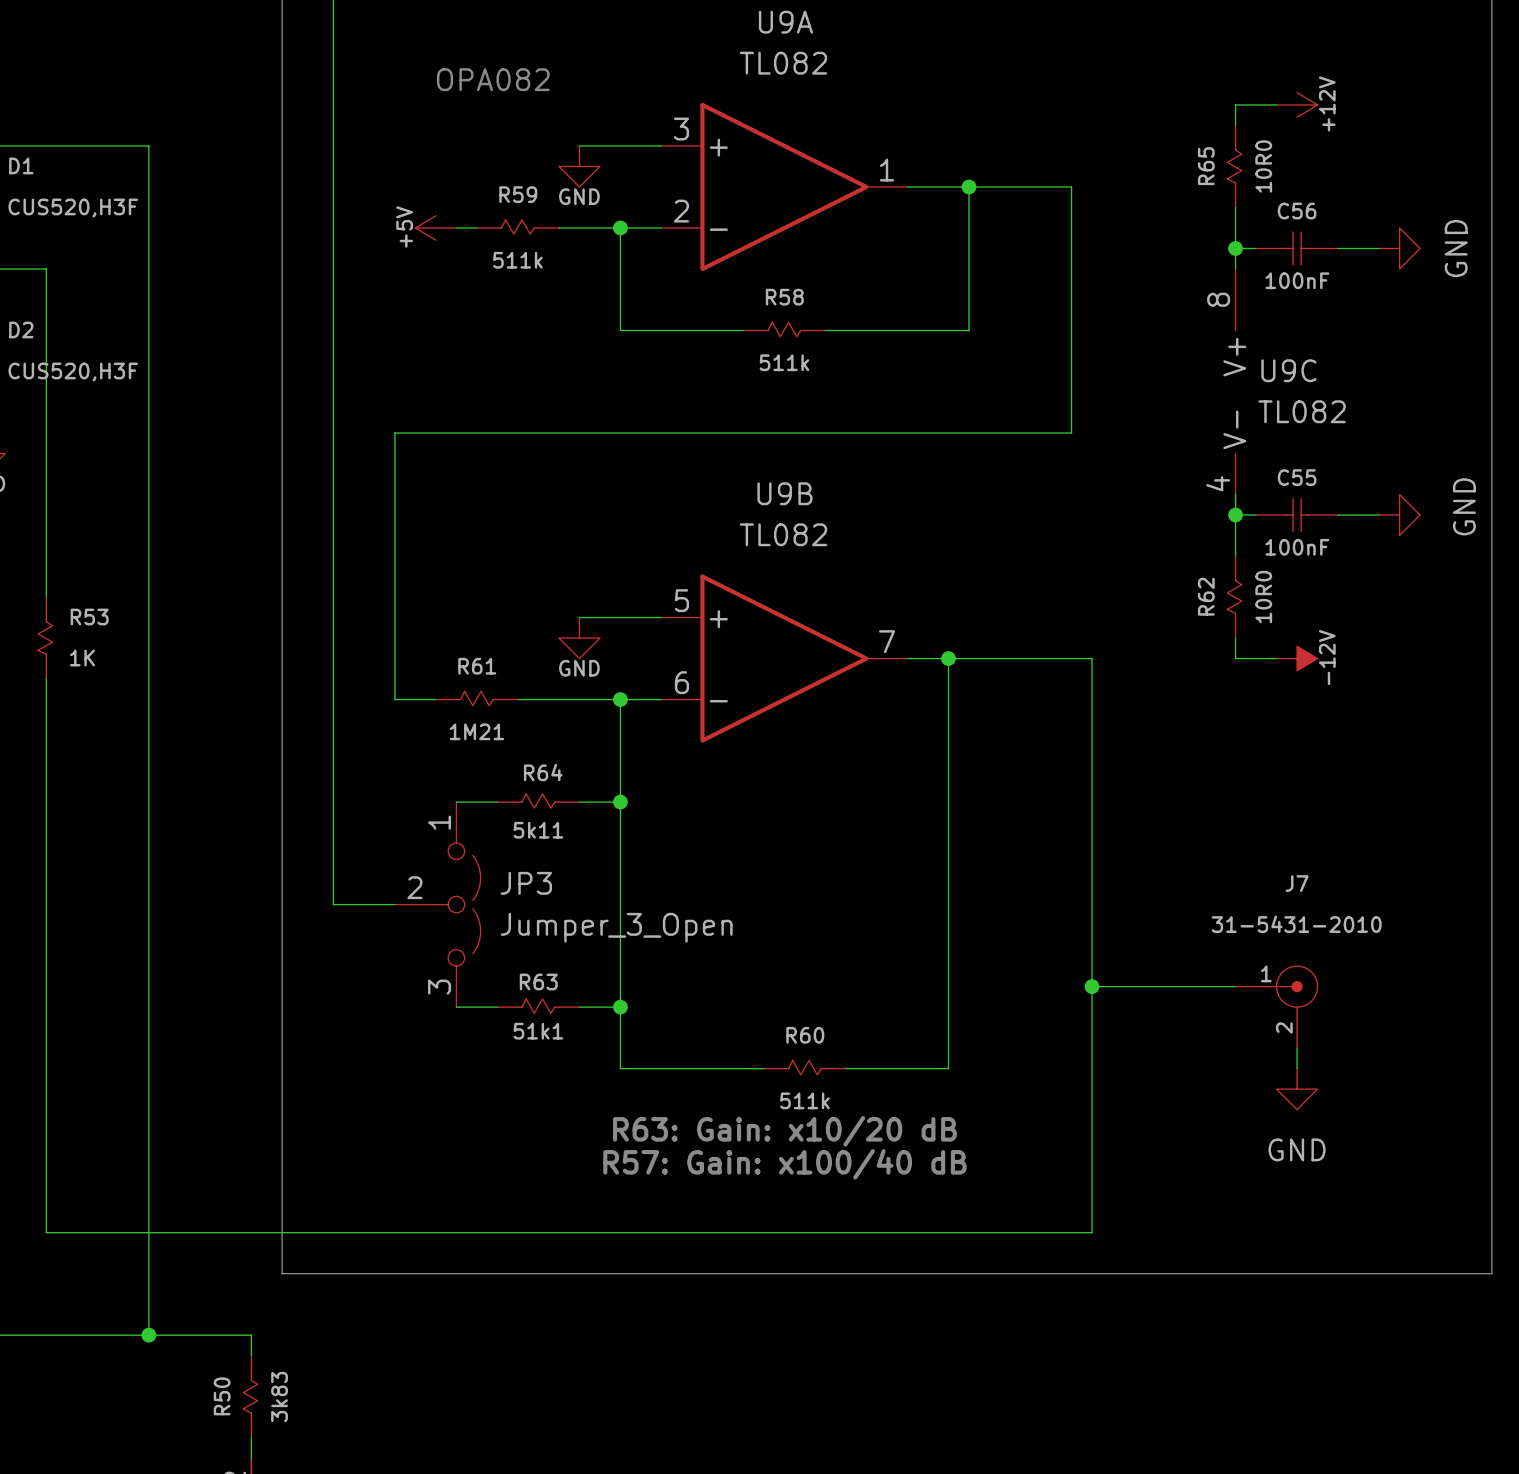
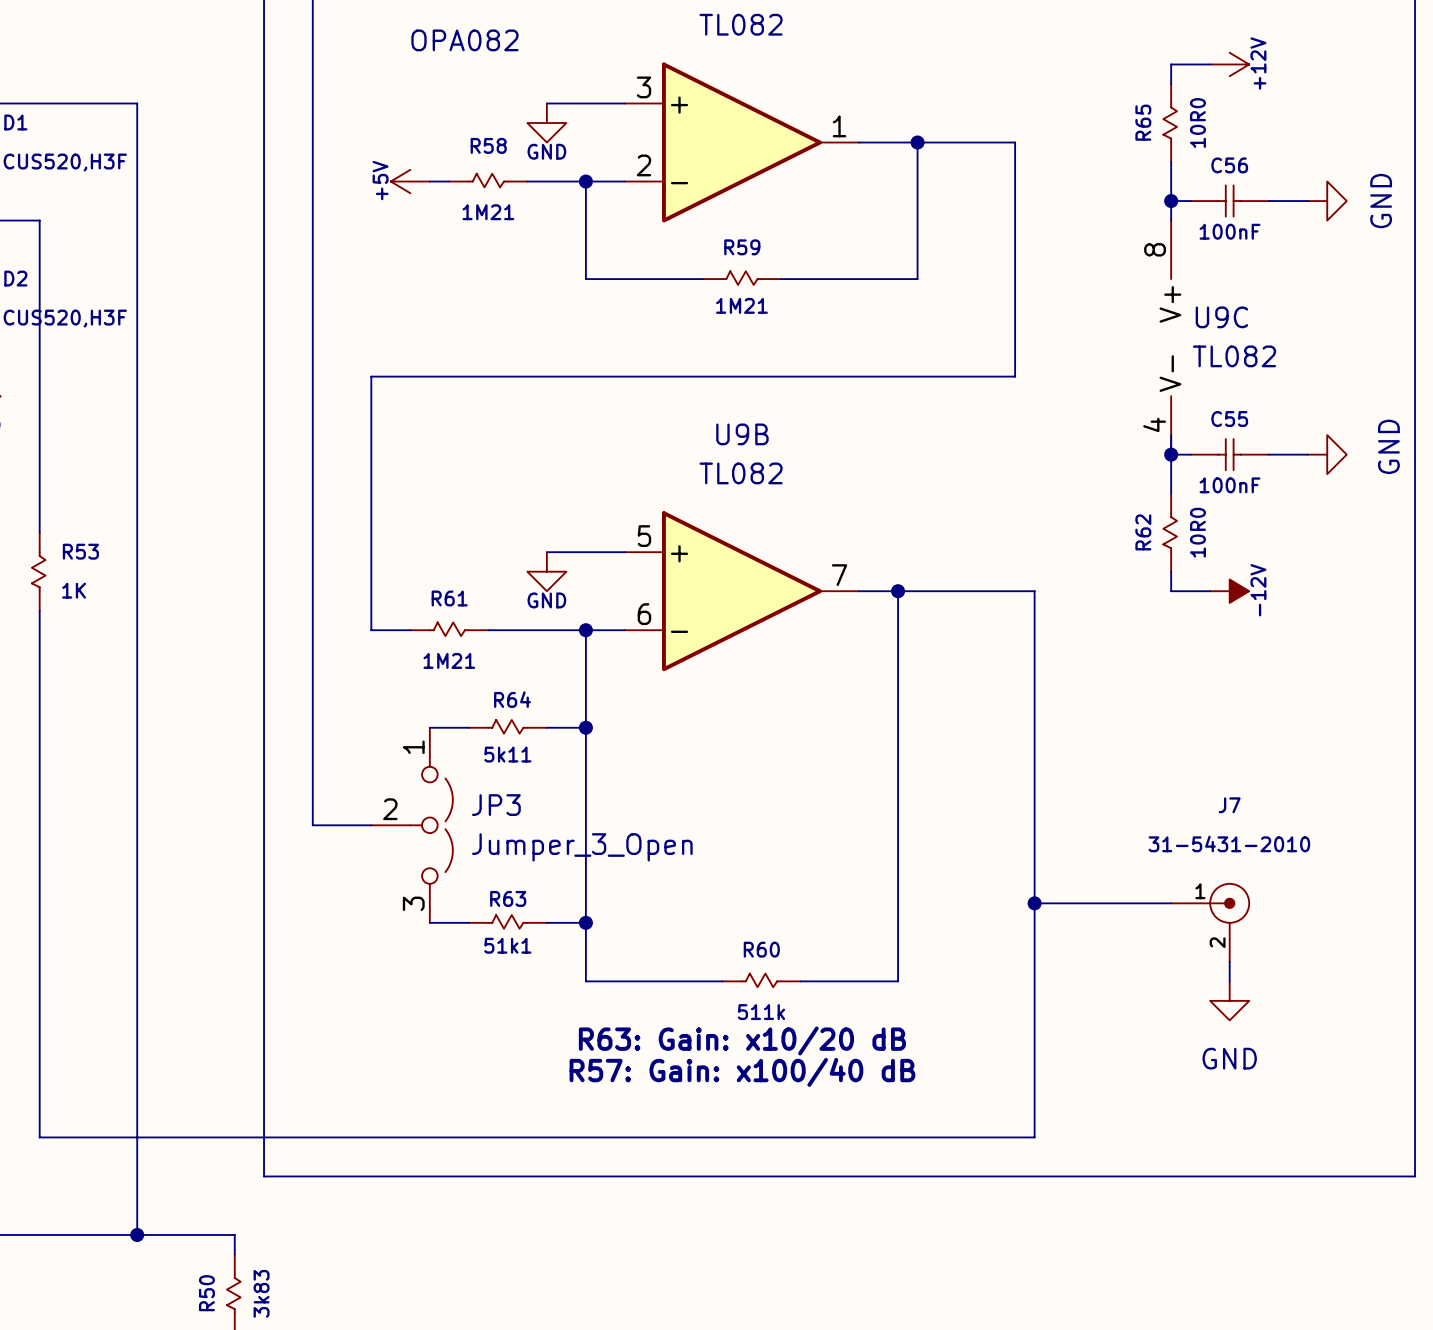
R59 name: R59 (518, 194) -> R58 (488, 145)
R59 text: 511k (517, 260) -> 1M21 (488, 212)
R58 name: R58 (784, 297) -> R59 (742, 247)
R58 text: 511k (784, 362) -> 1M21 (741, 305)

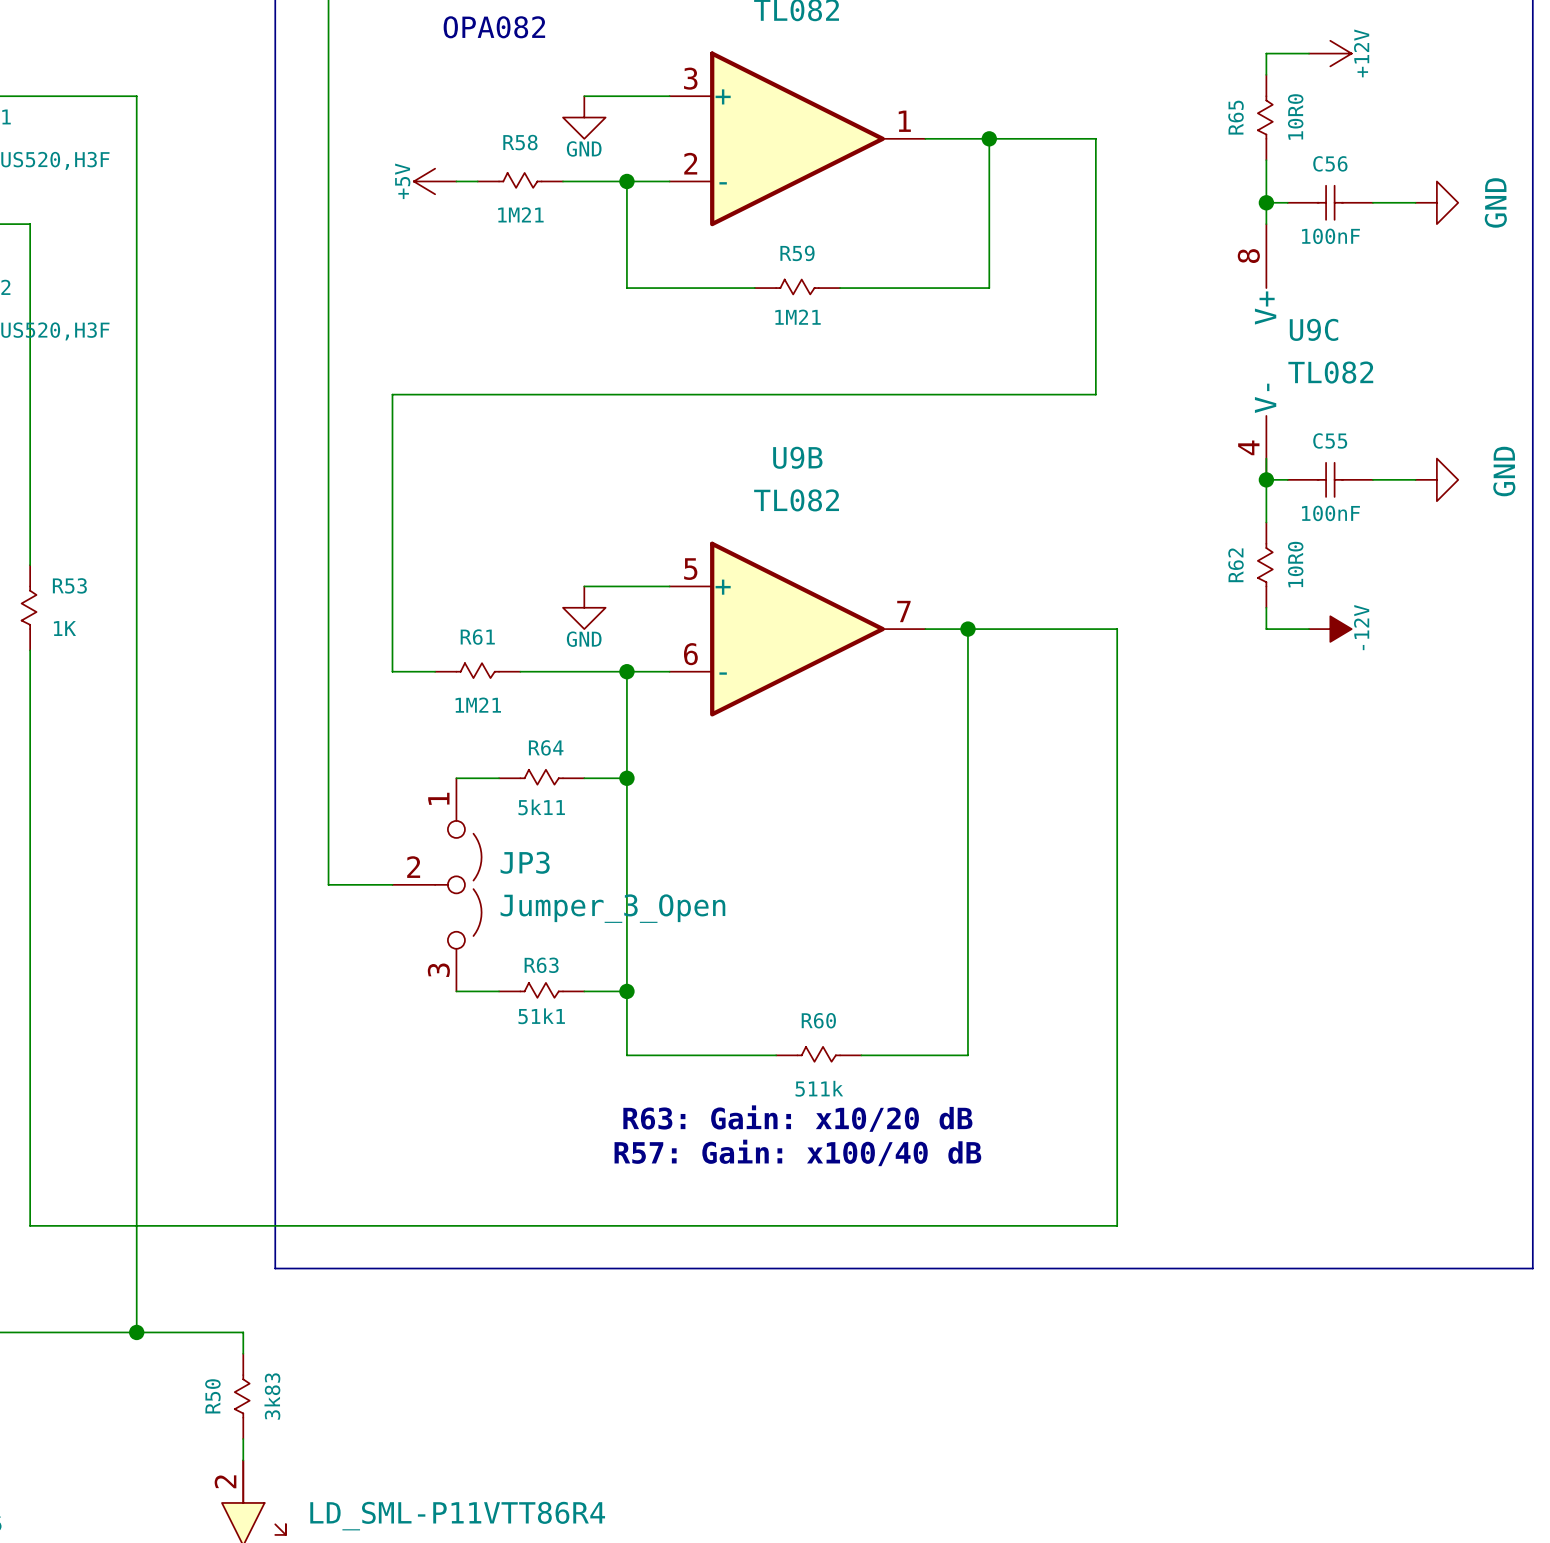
wire: (1034, 903) (1171, 903) -> none
junction: (1034, 903) -> none
J7: (1210, 922) -> none
wire: (1229, 961) (1229, 981) -> none
power symbol: GND (1229, 1000) -> none

